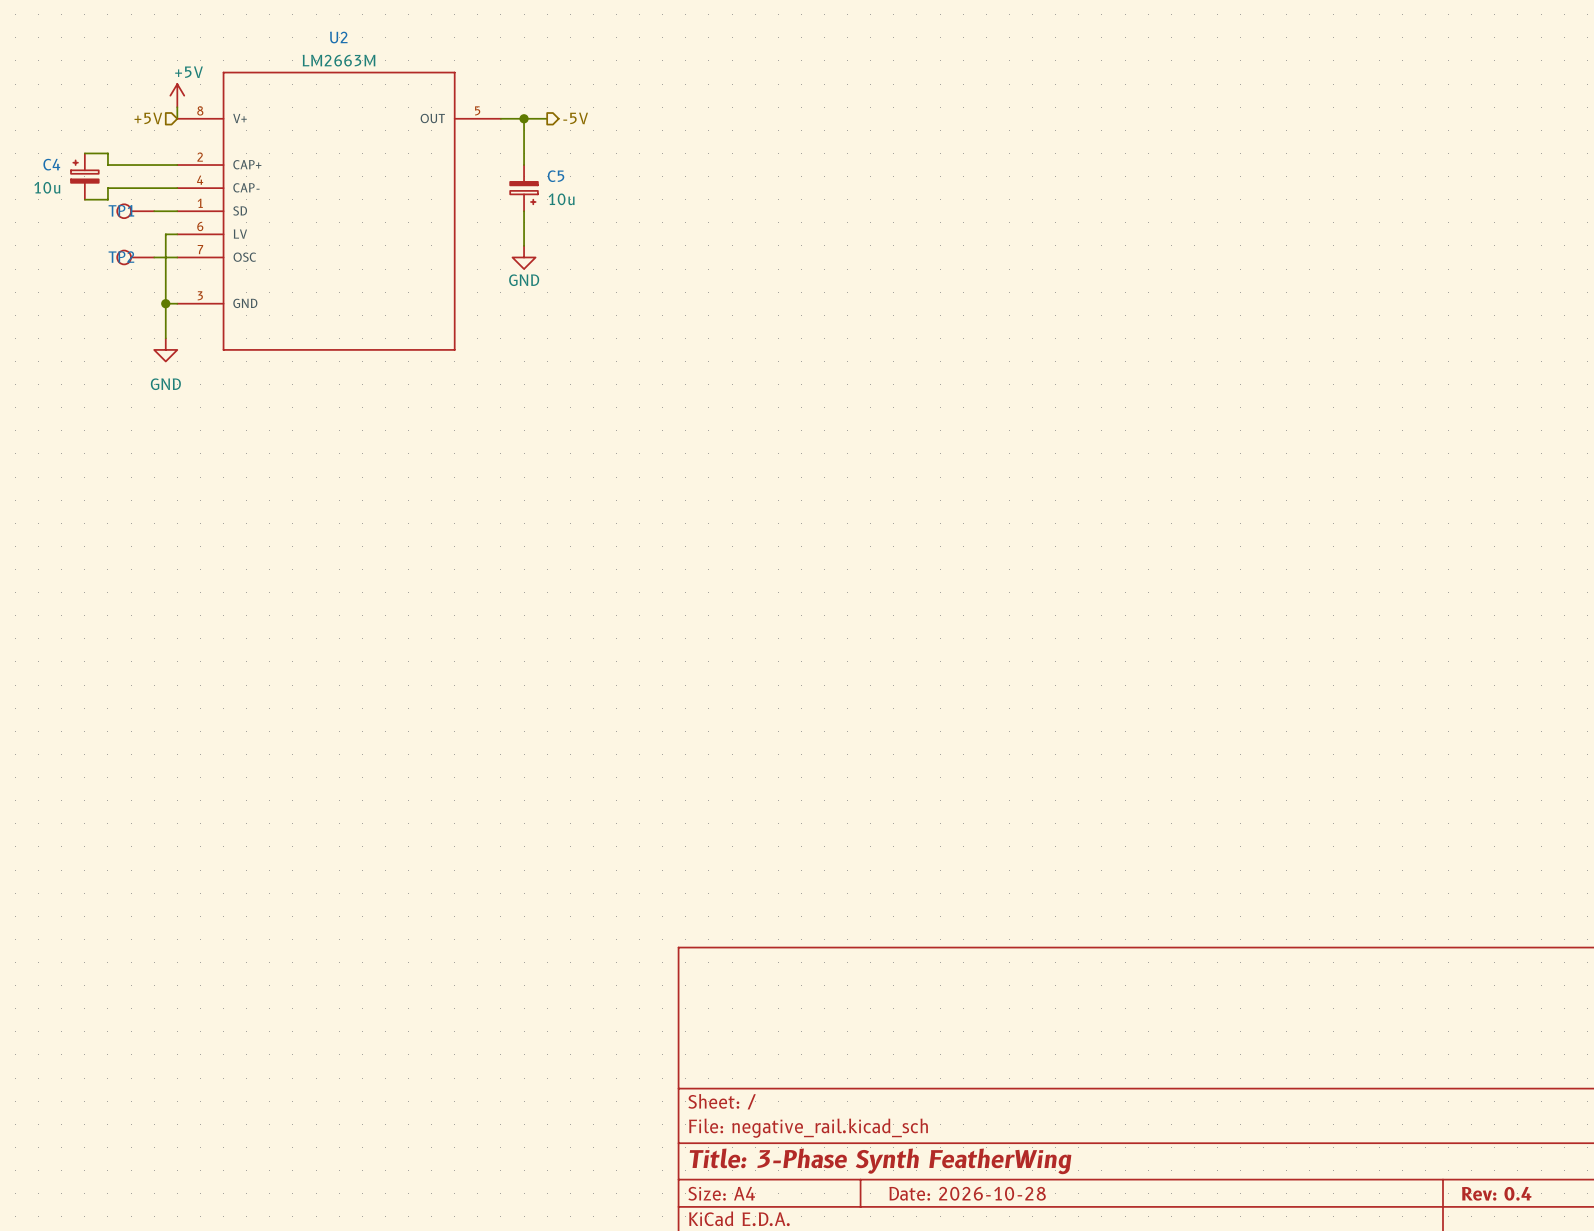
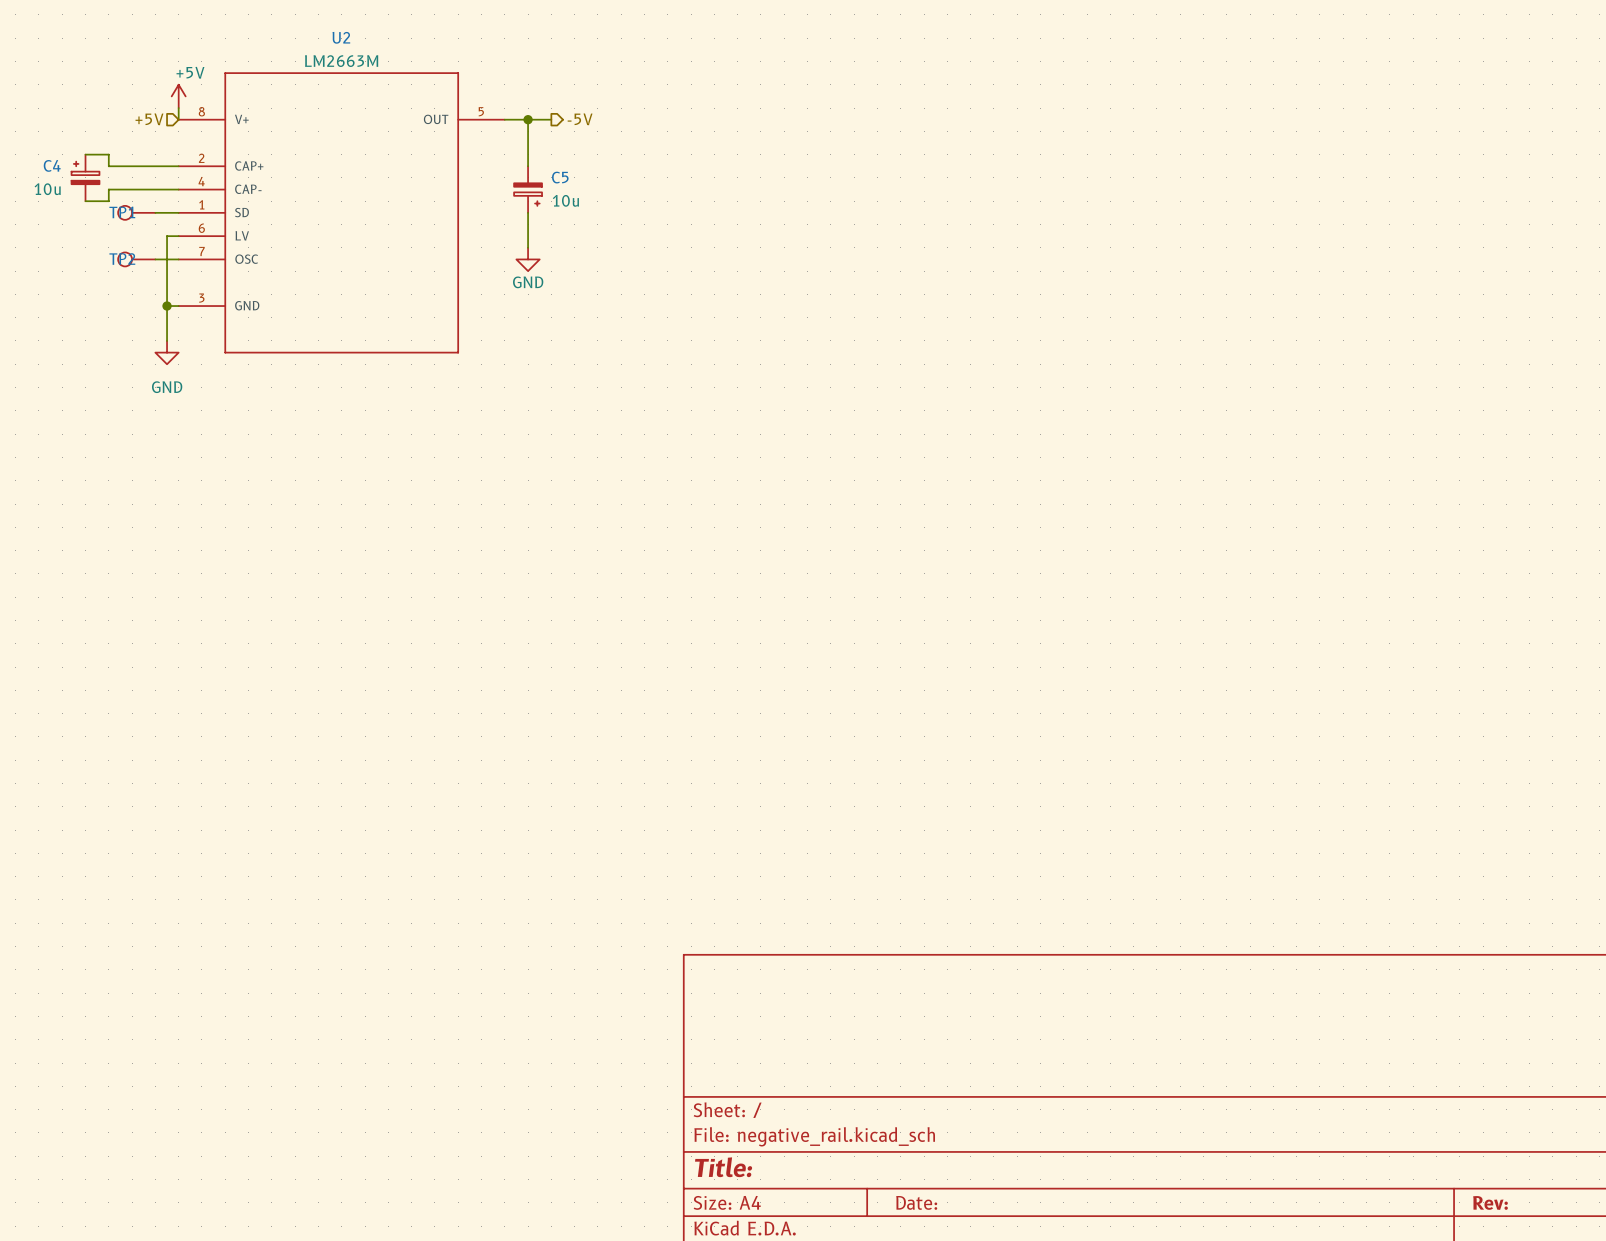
title block: Title: 3-Phase Synth FeatherWing (880, 1161) -> Title: (723, 1167)
title block: Date: 2026-10-28 (967, 1193) -> Date: (916, 1202)
title block: Rev: 0.4 (1496, 1193) -> Rev: (1490, 1202)

